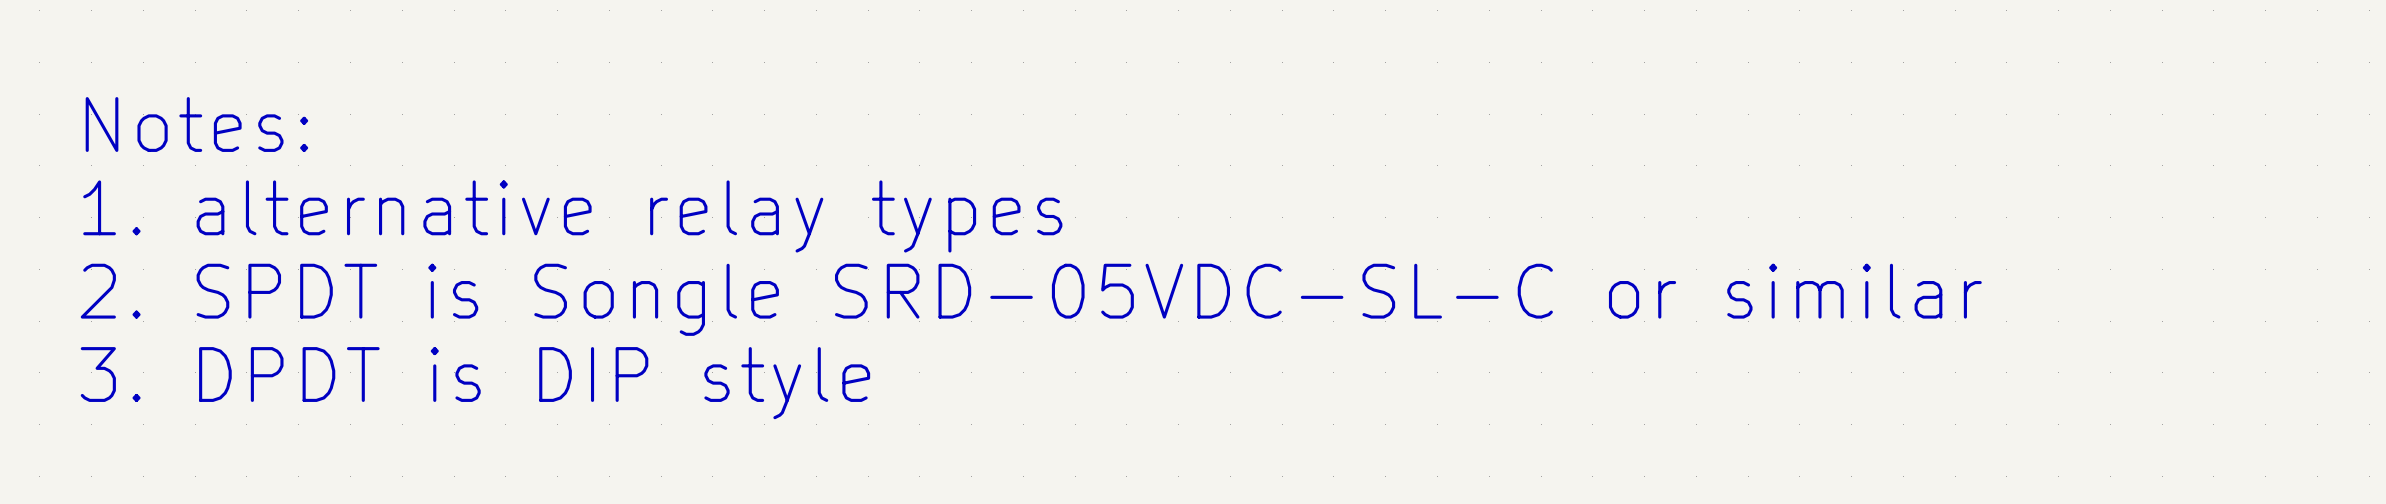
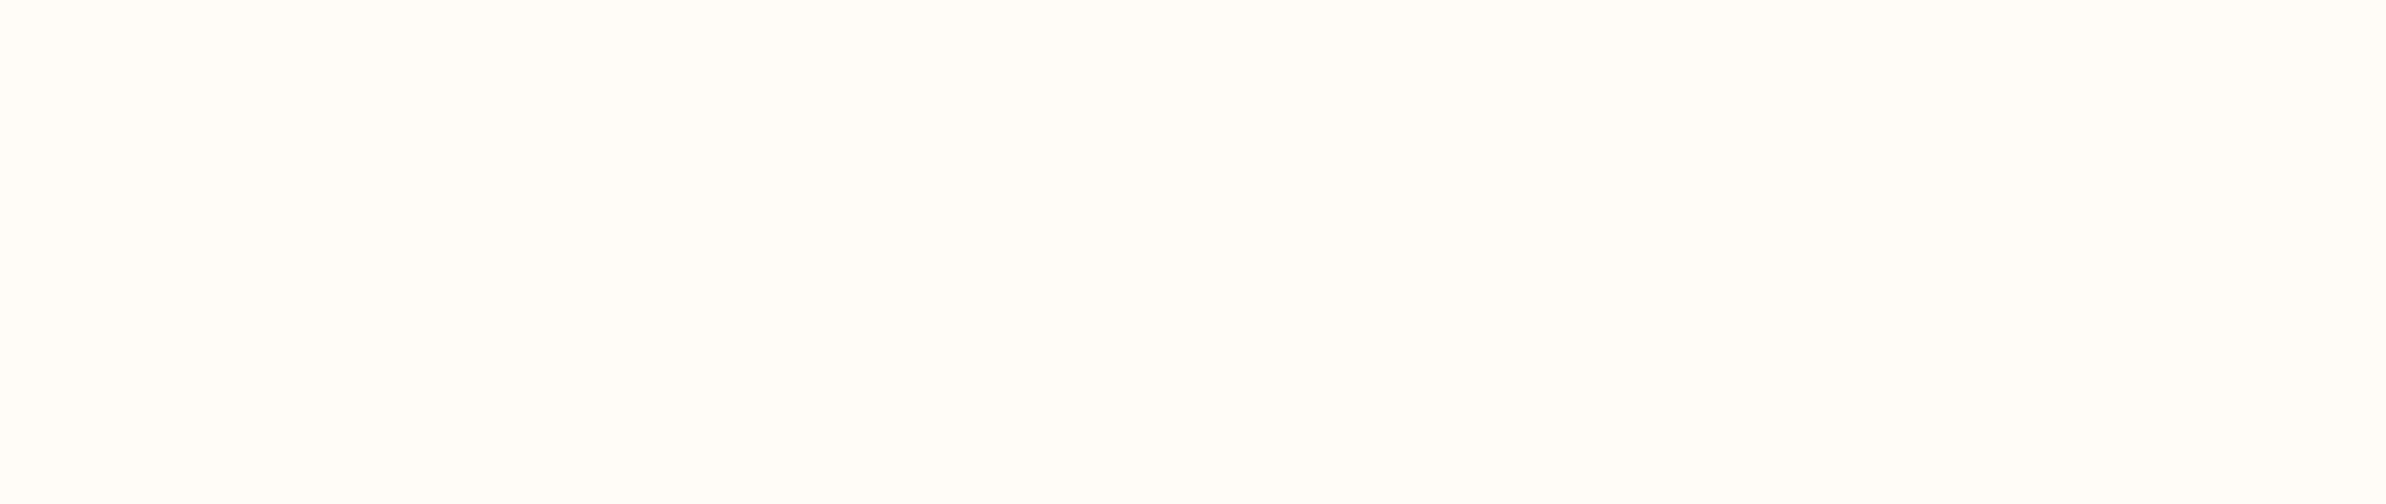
text: Notes: (196, 124) -> none
text: 1. alternative relay types (572, 216) -> none
text: 2. SPDT is Songle SRD-05VDC-SL-C or similar (1031, 299) -> none
text: 3. DPDT is DIP style (475, 383) -> none

